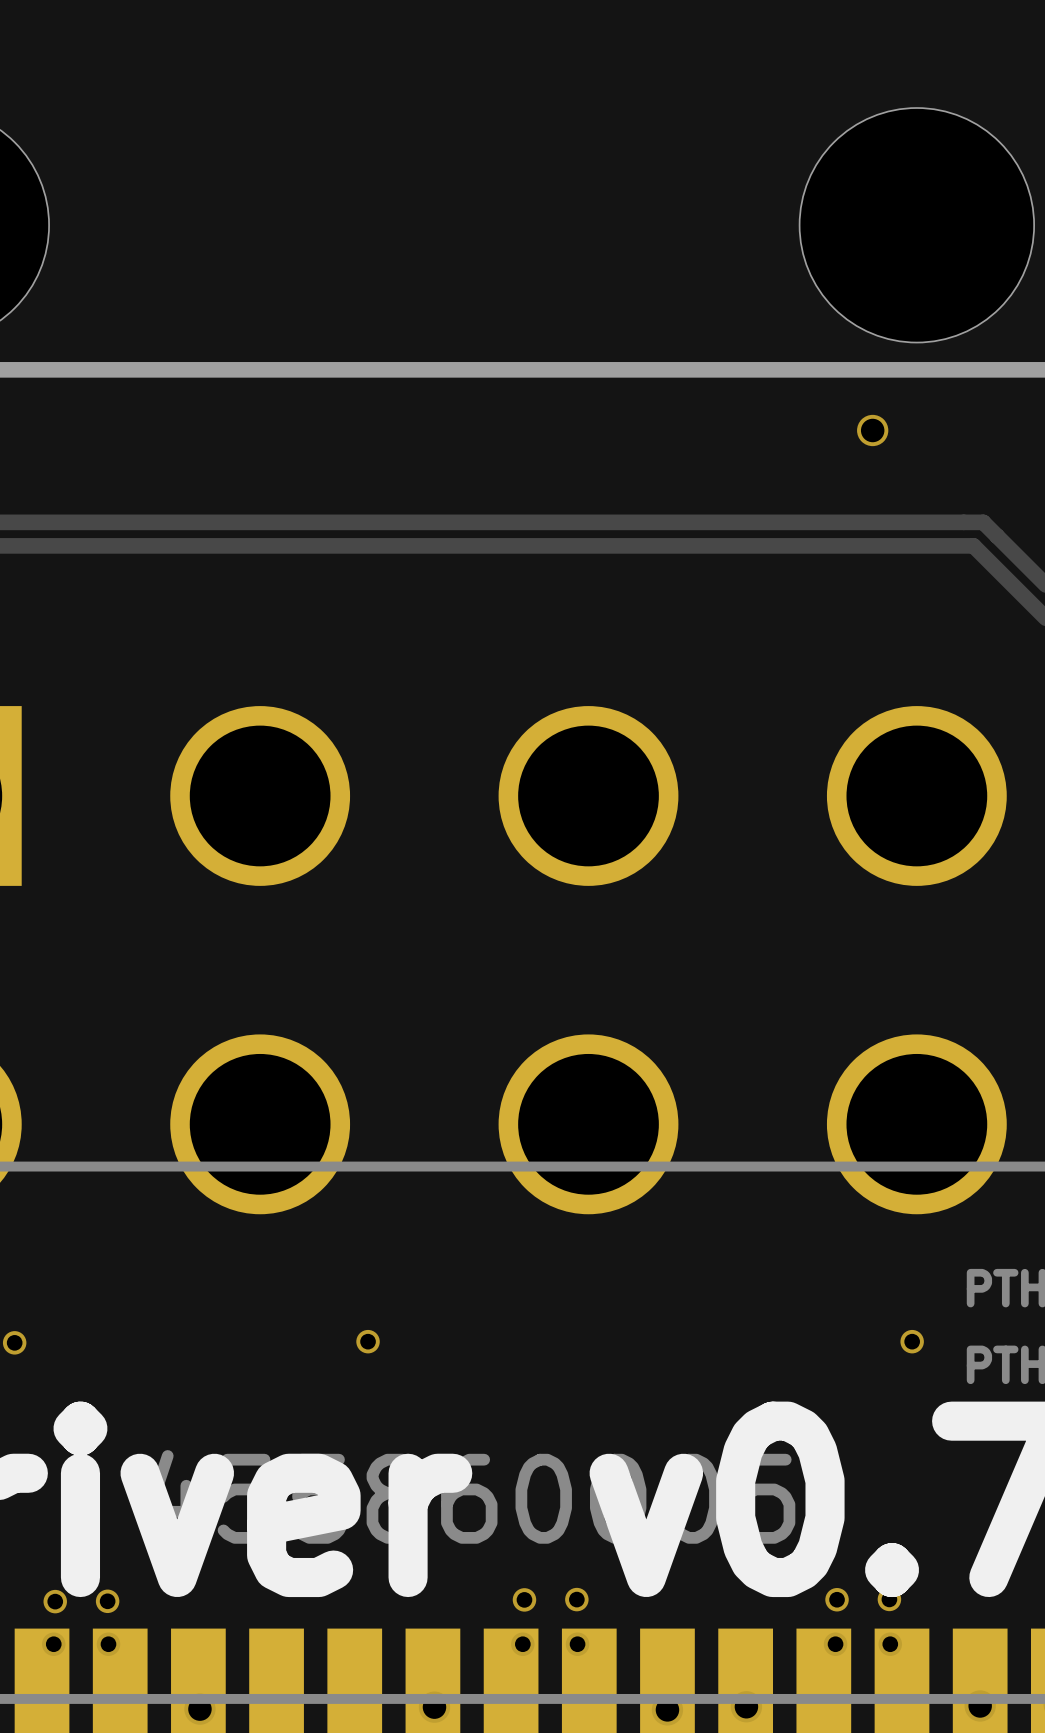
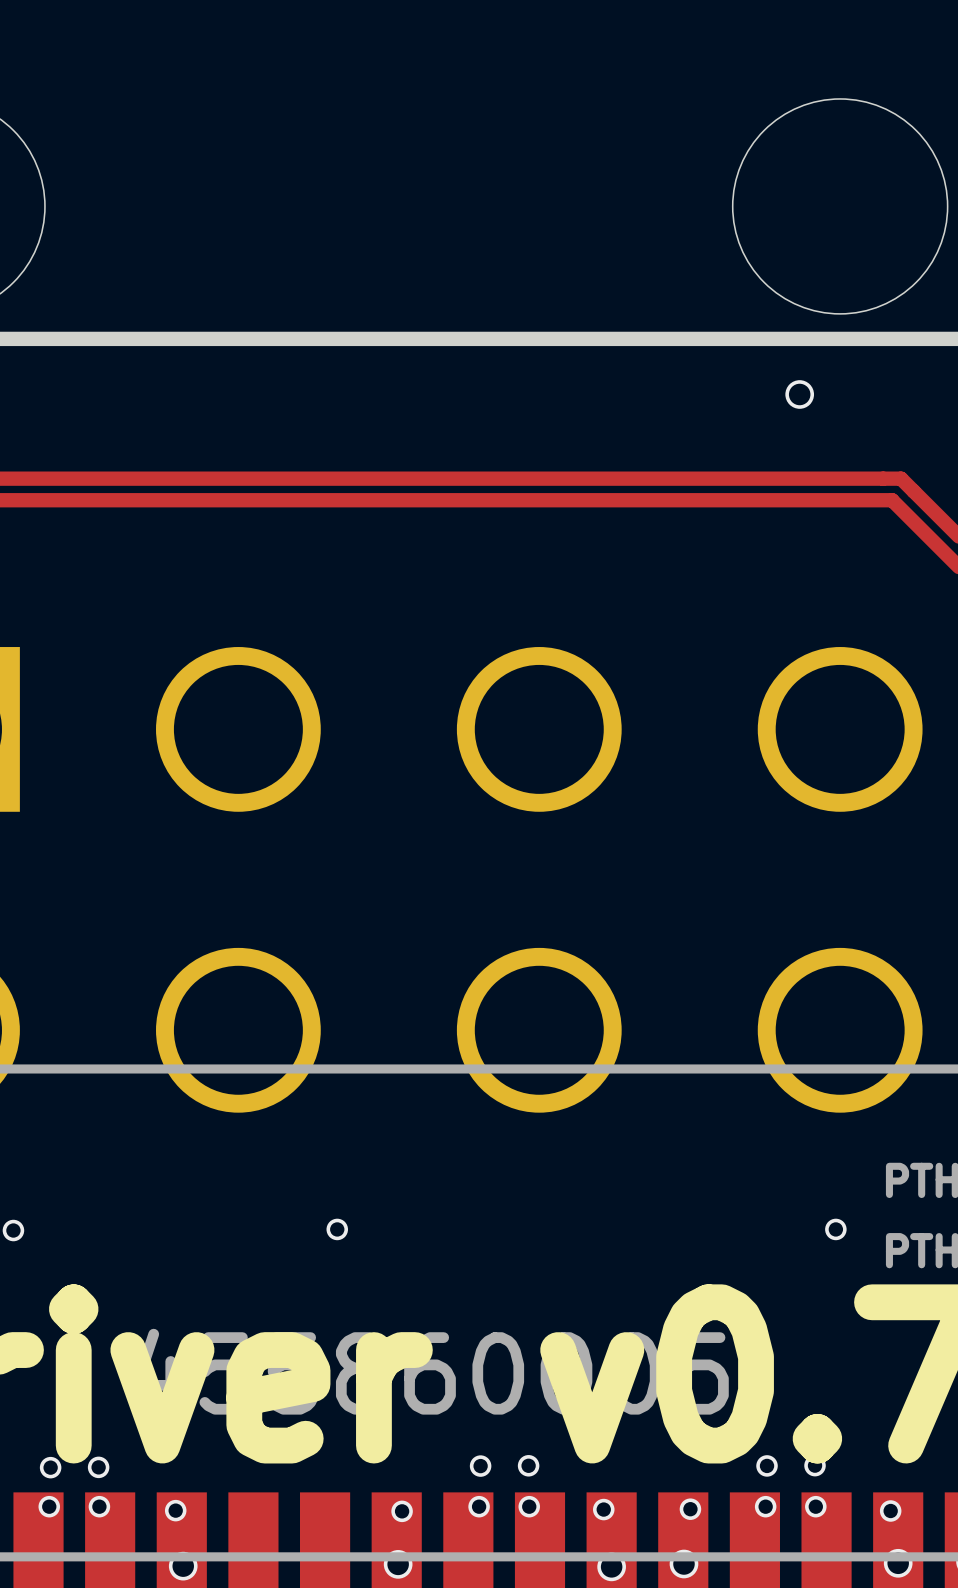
via: none -> (690, 1509)
via: none -> (603, 1509)
via: none -> (175, 1510)
via: none -> (890, 1510)
via: none -> (402, 1511)

